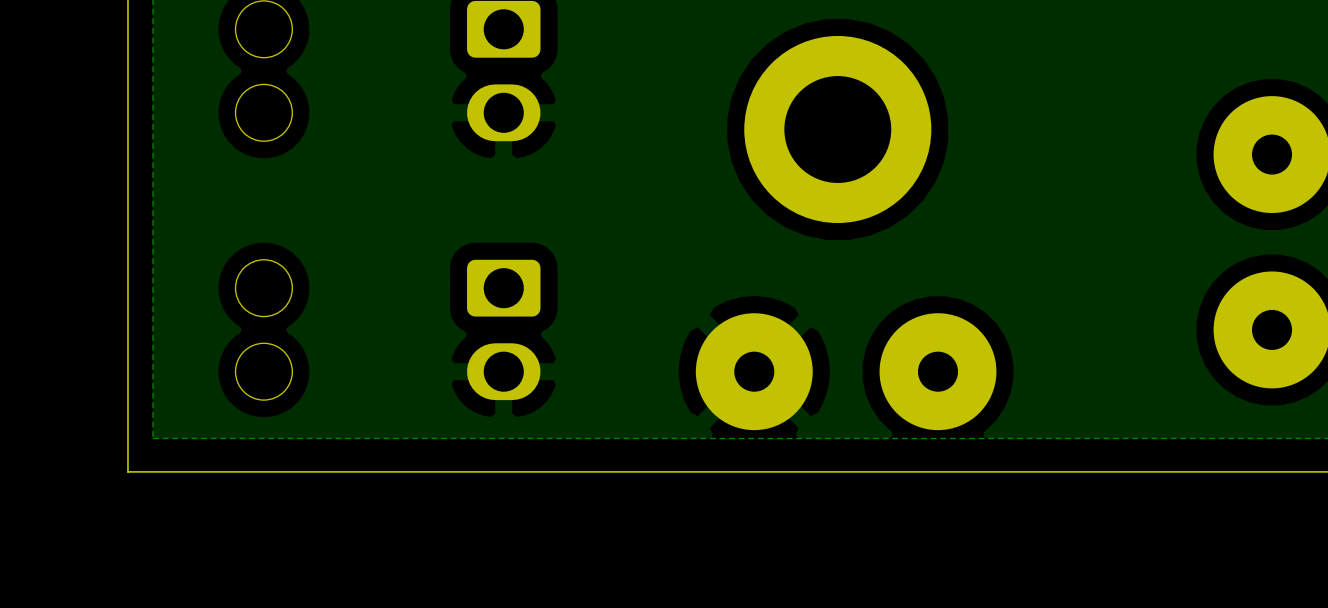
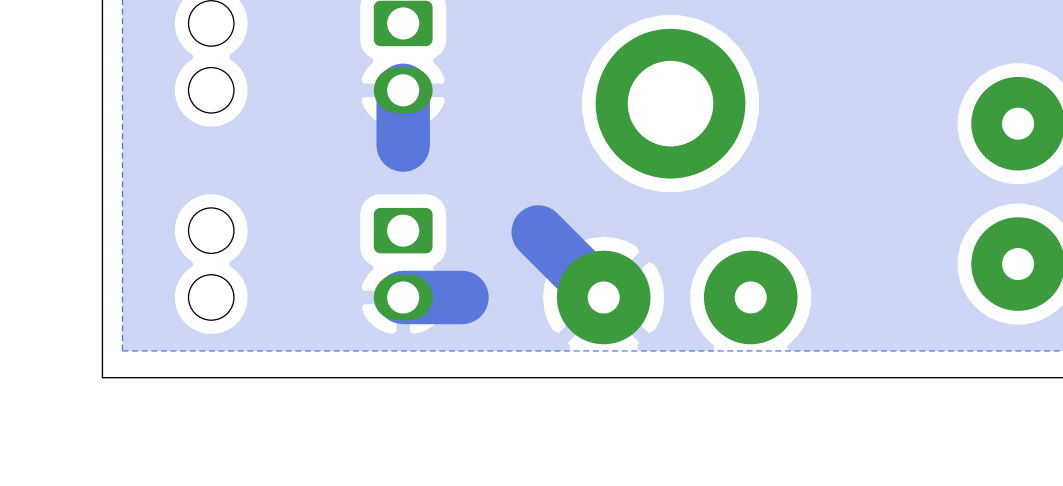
track: none -> (403, 90) (403, 145)
track: none -> (538, 231) (603, 297)
track: none -> (462, 297) (403, 297)

